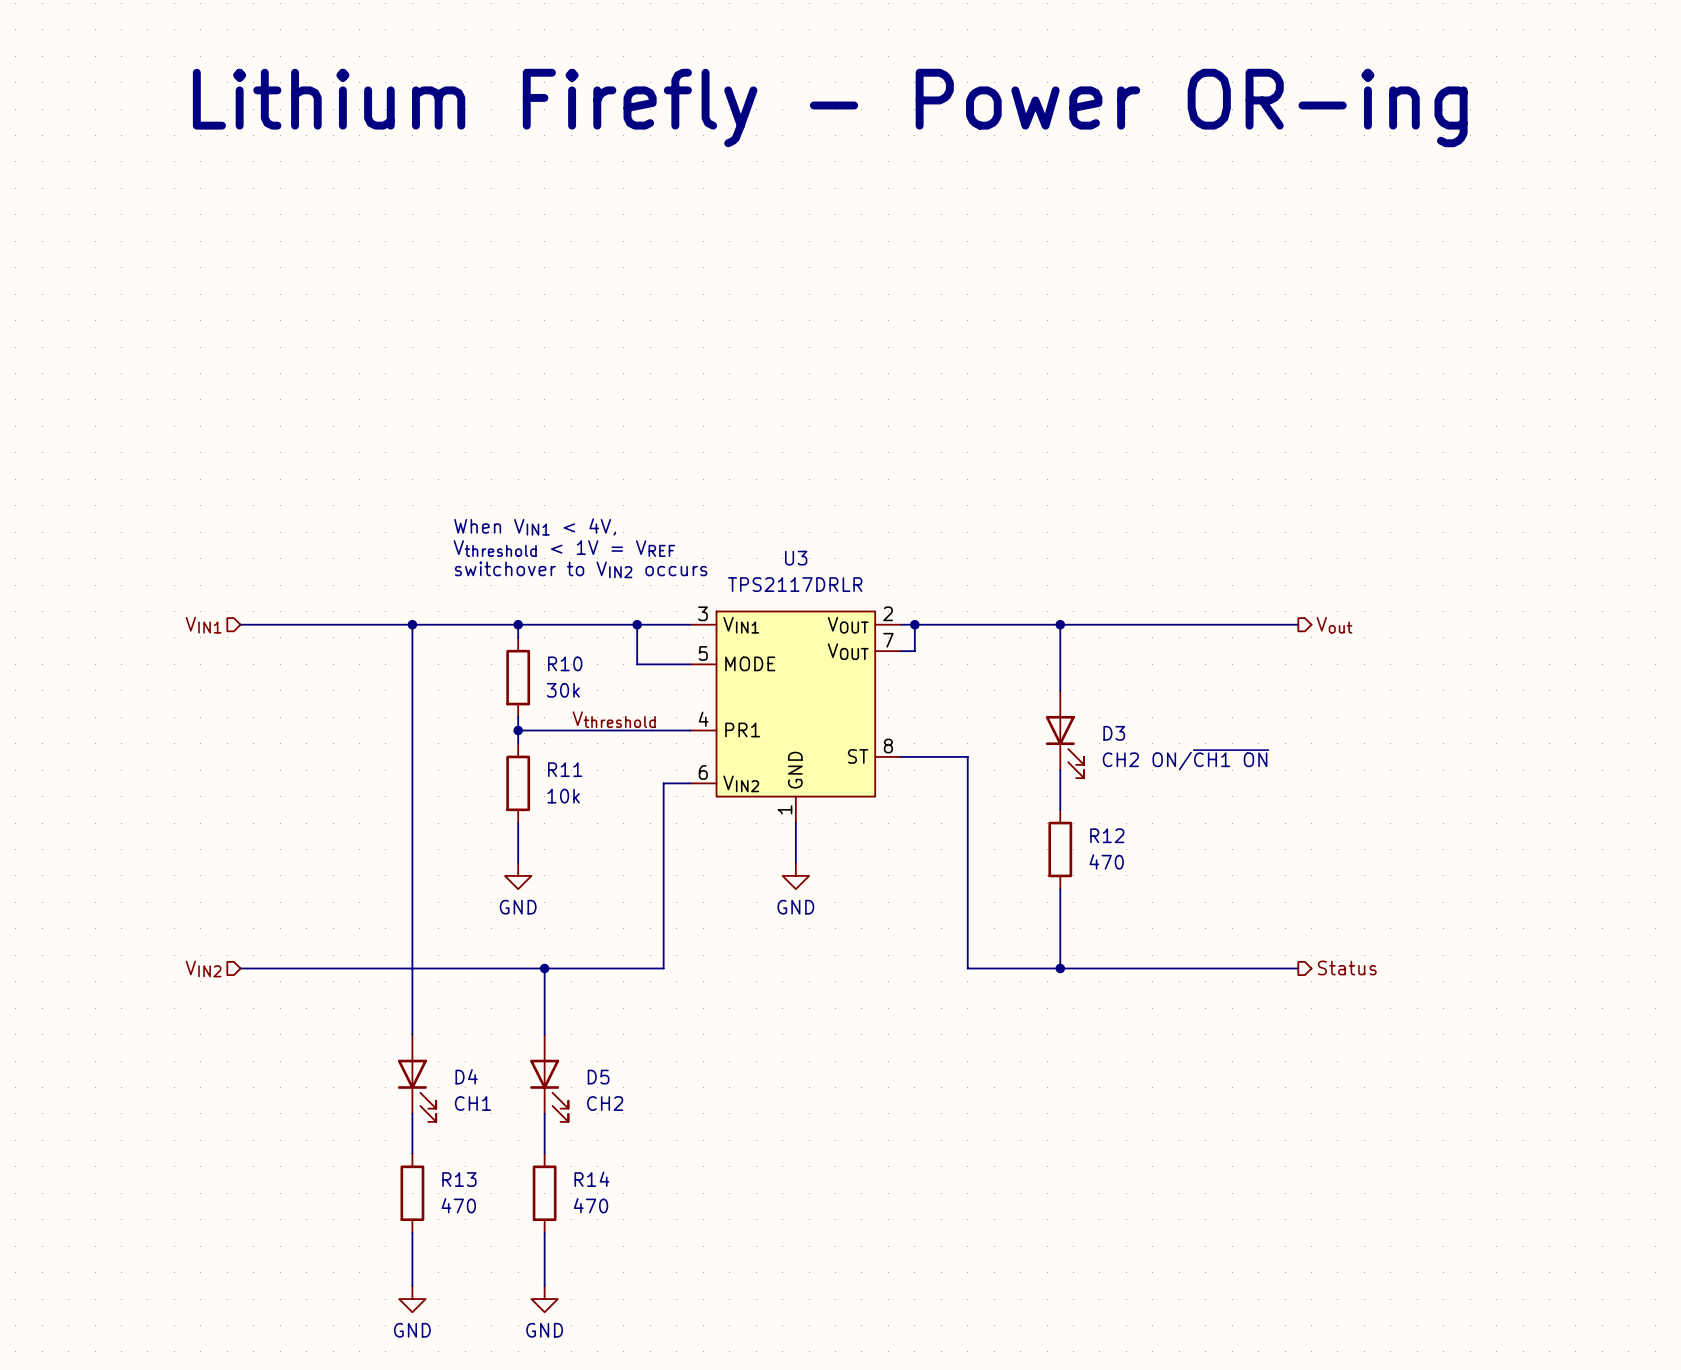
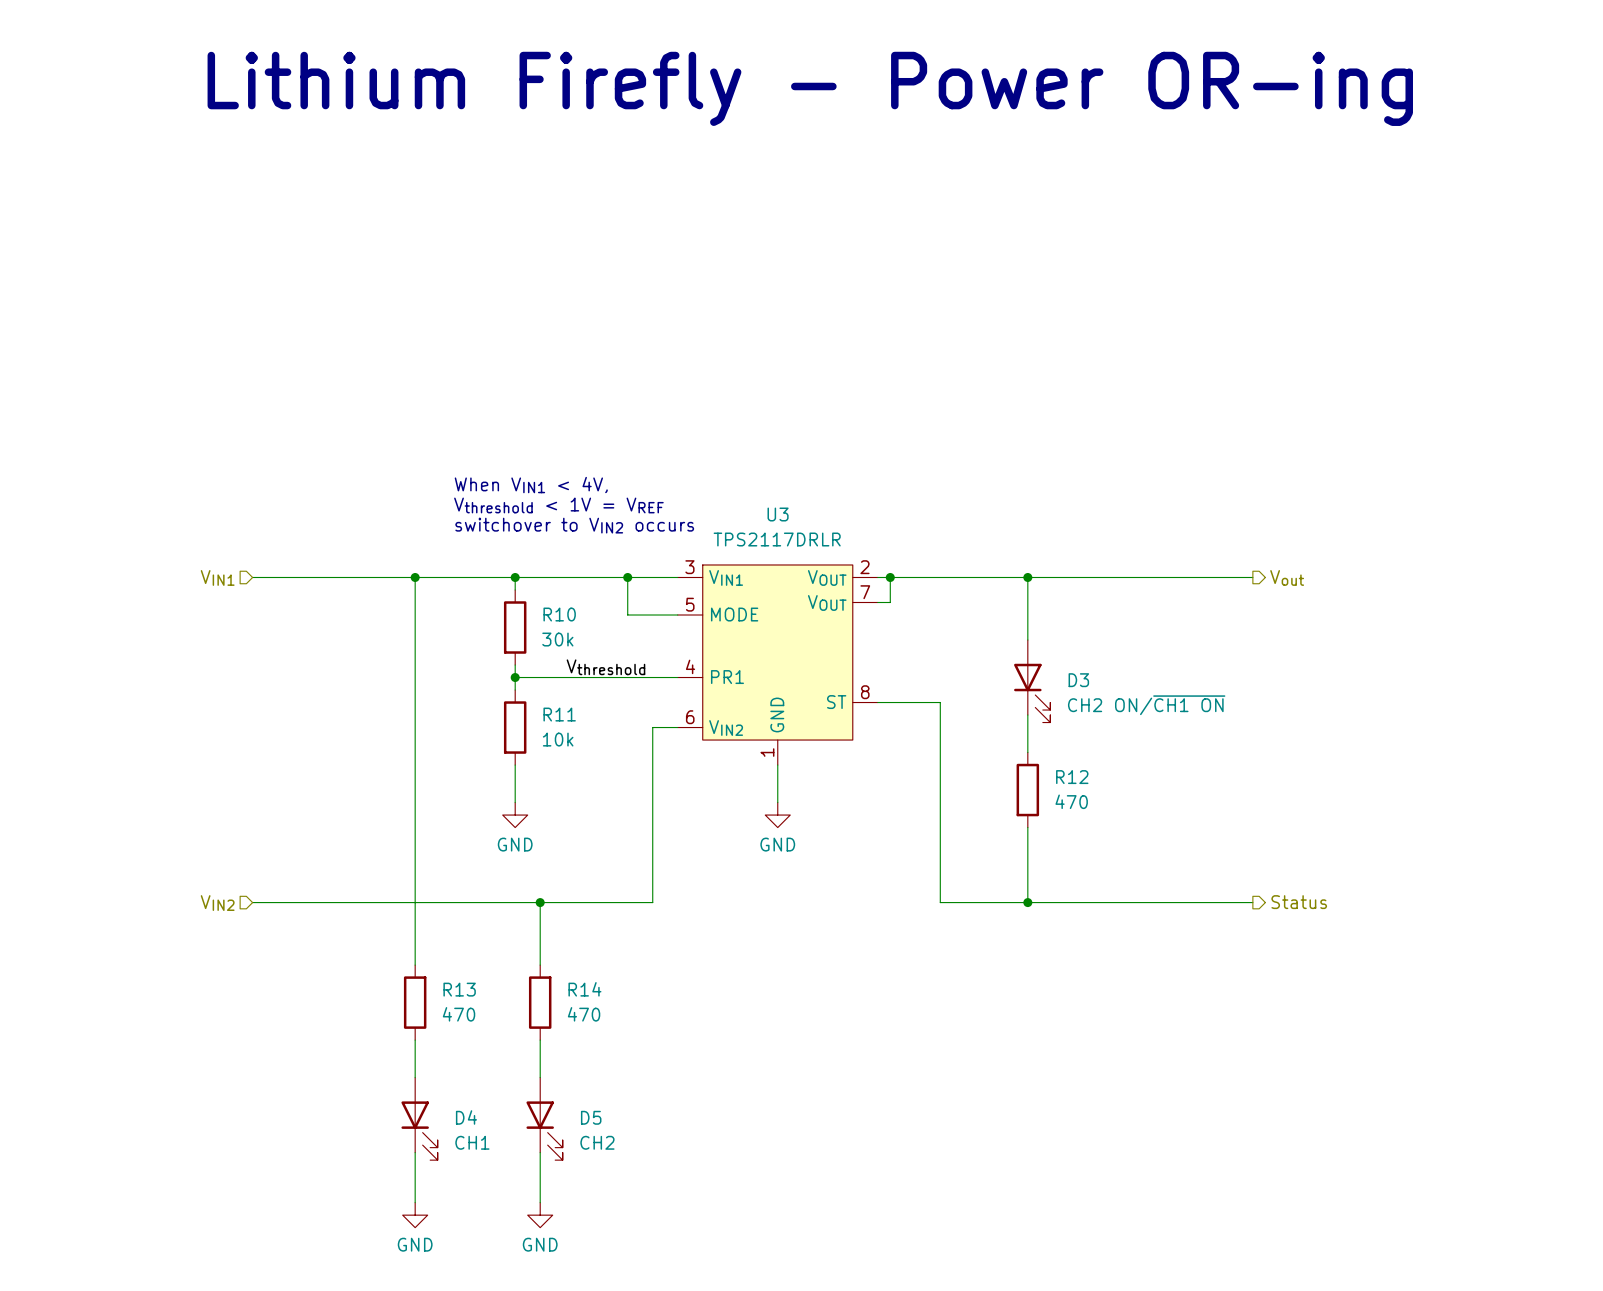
D4 position: (417, 1078) -> (419, 1118)
D5 position: (549, 1078) -> (544, 1118)
R13 position: (412, 1193) -> (415, 1002)
R14 position: (544, 1193) -> (540, 1002)

